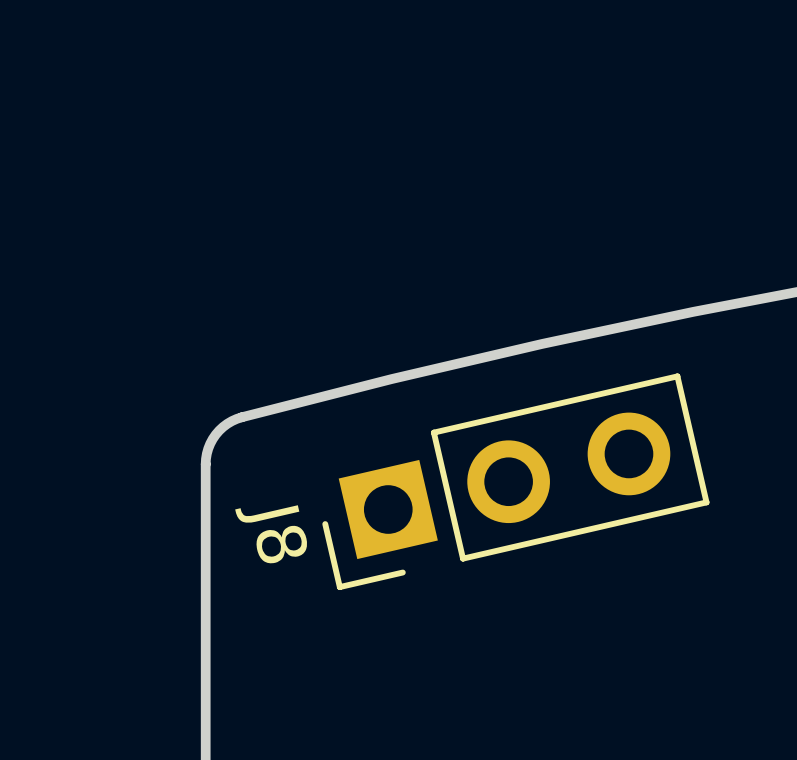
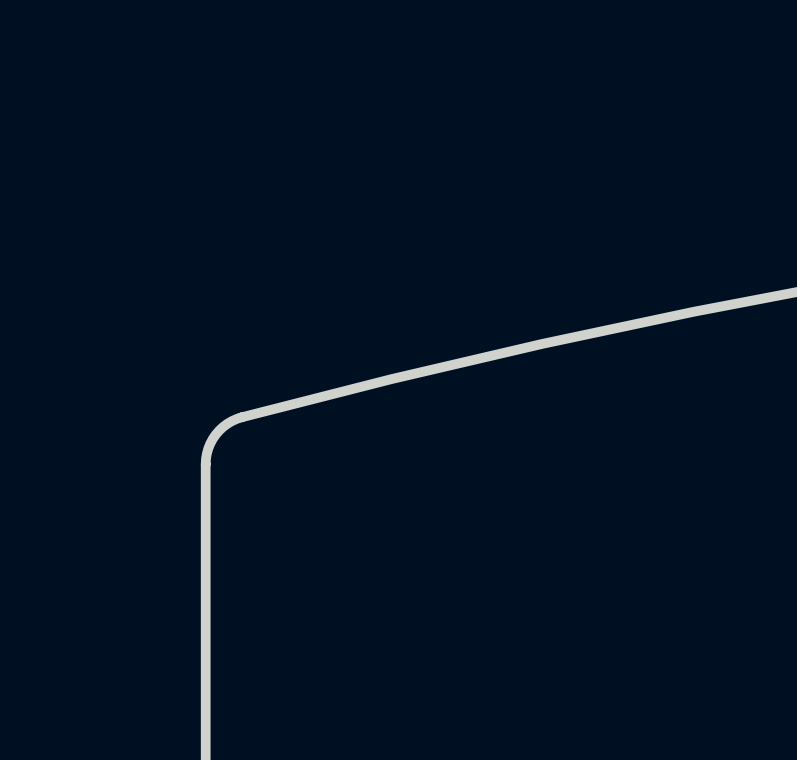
J8: (515, 481) -> none

